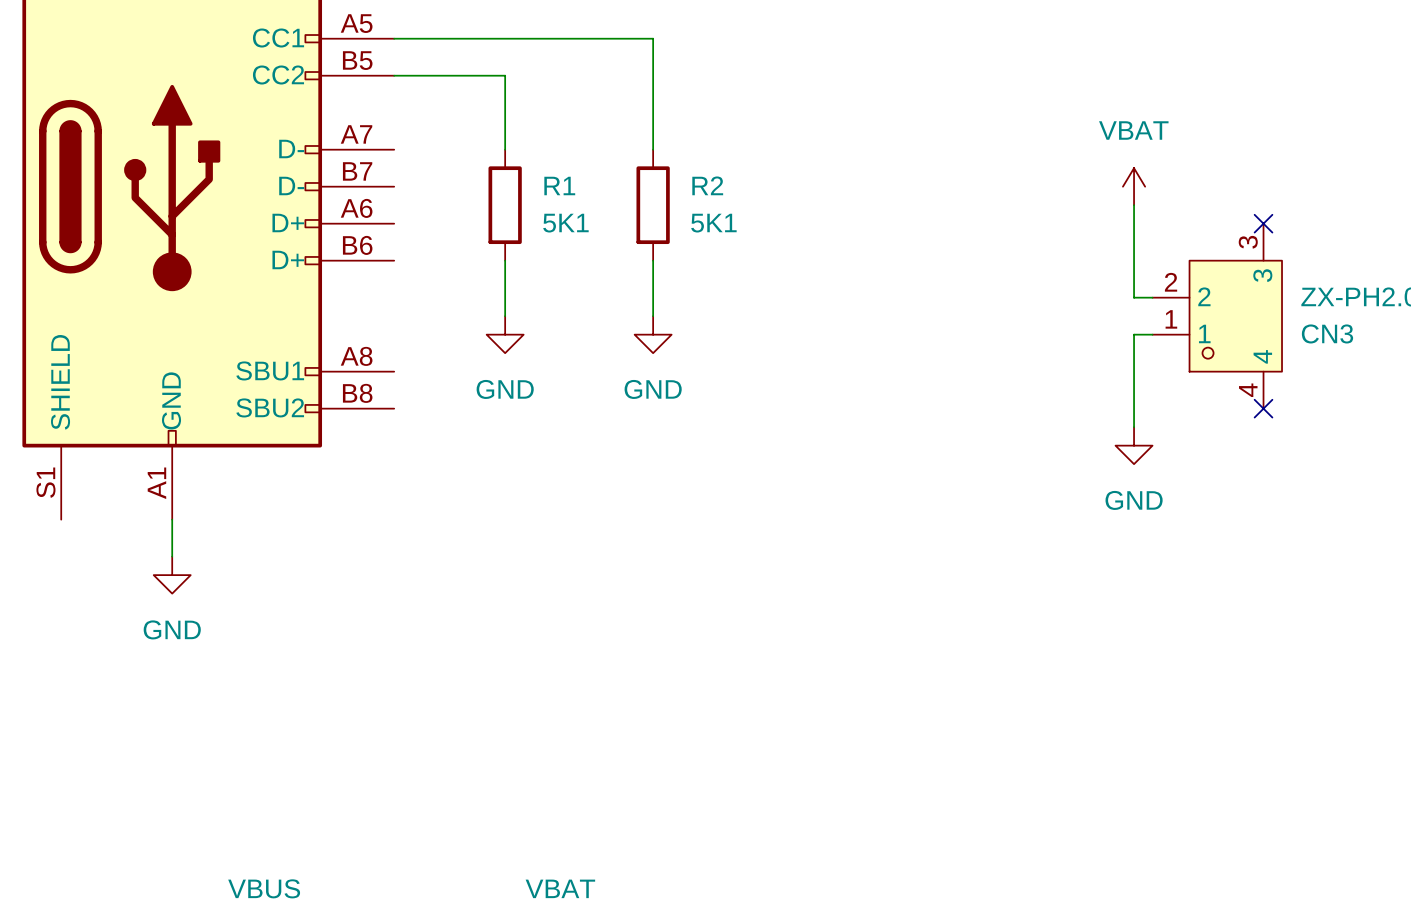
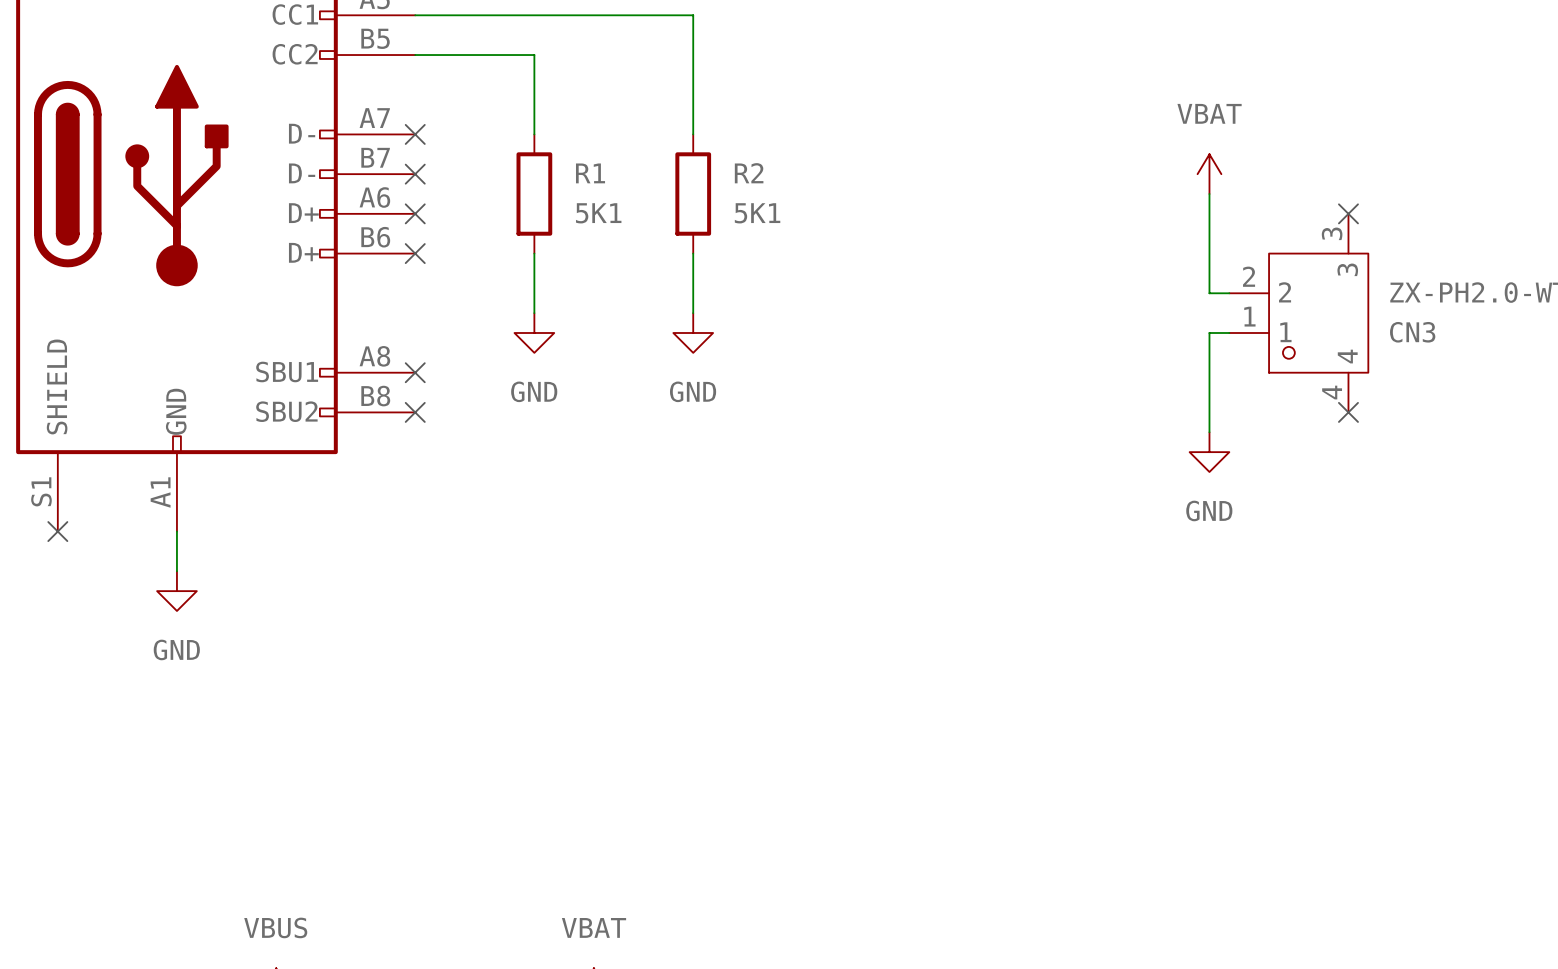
no-connect mark: none -> (415, 134)
no-connect mark: none -> (415, 174)
no-connect mark: none -> (415, 213)
no-connect mark: none -> (415, 253)
no-connect mark: none -> (415, 372)
no-connect mark: none -> (415, 412)
no-connect mark: none -> (57, 531)

